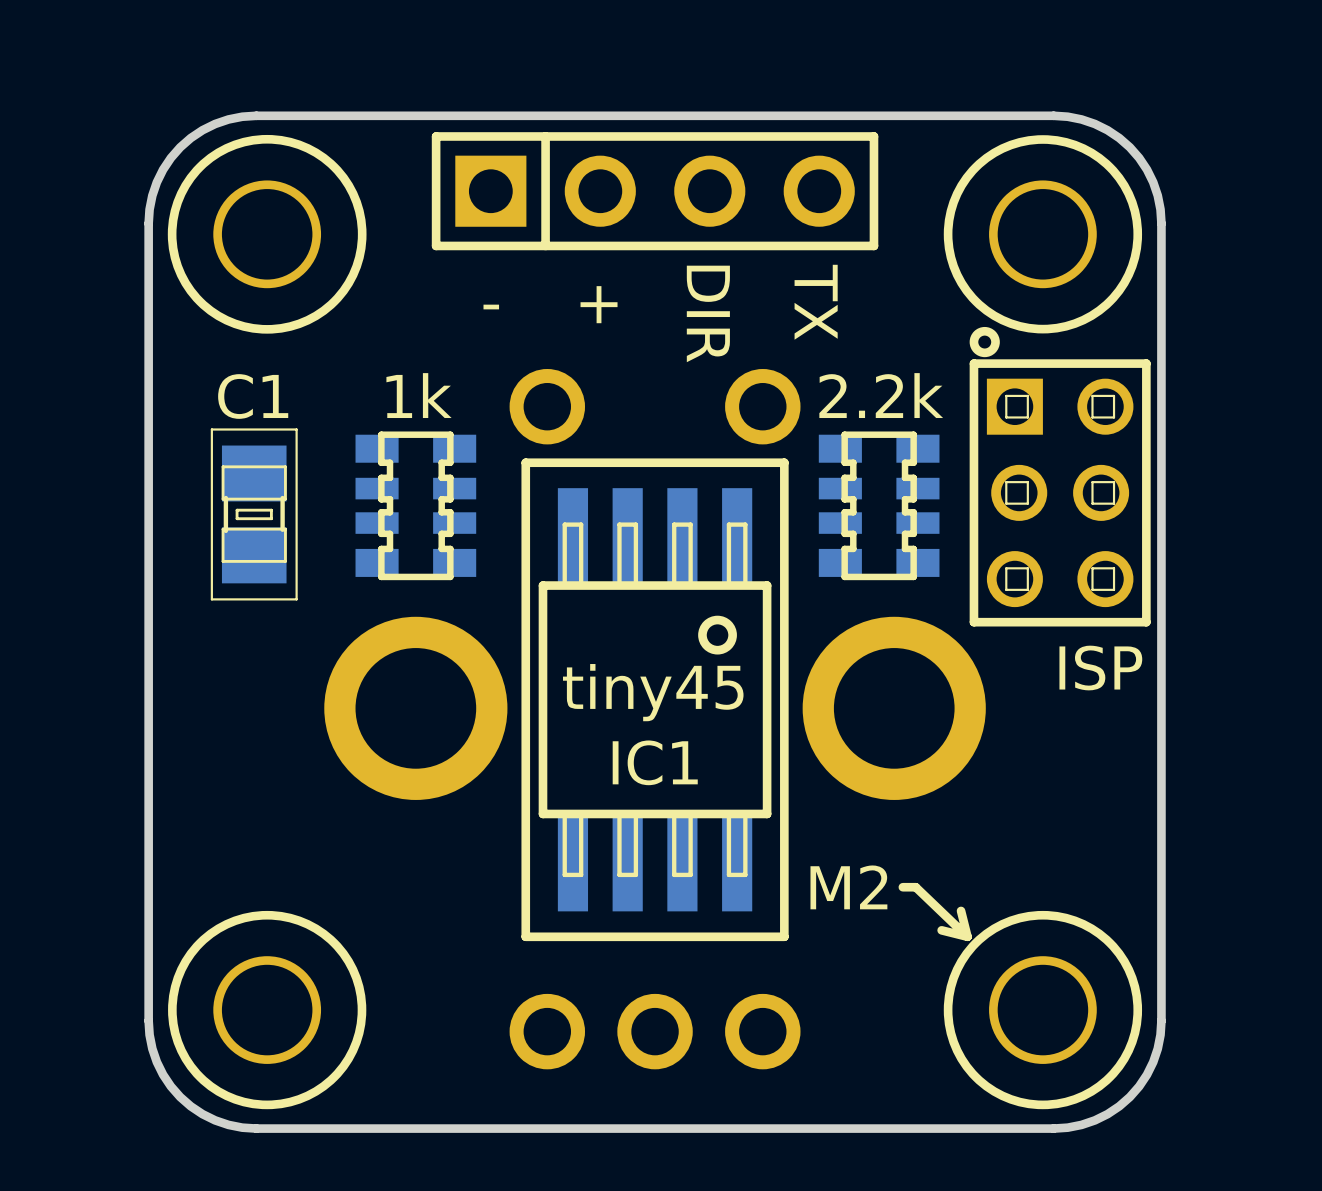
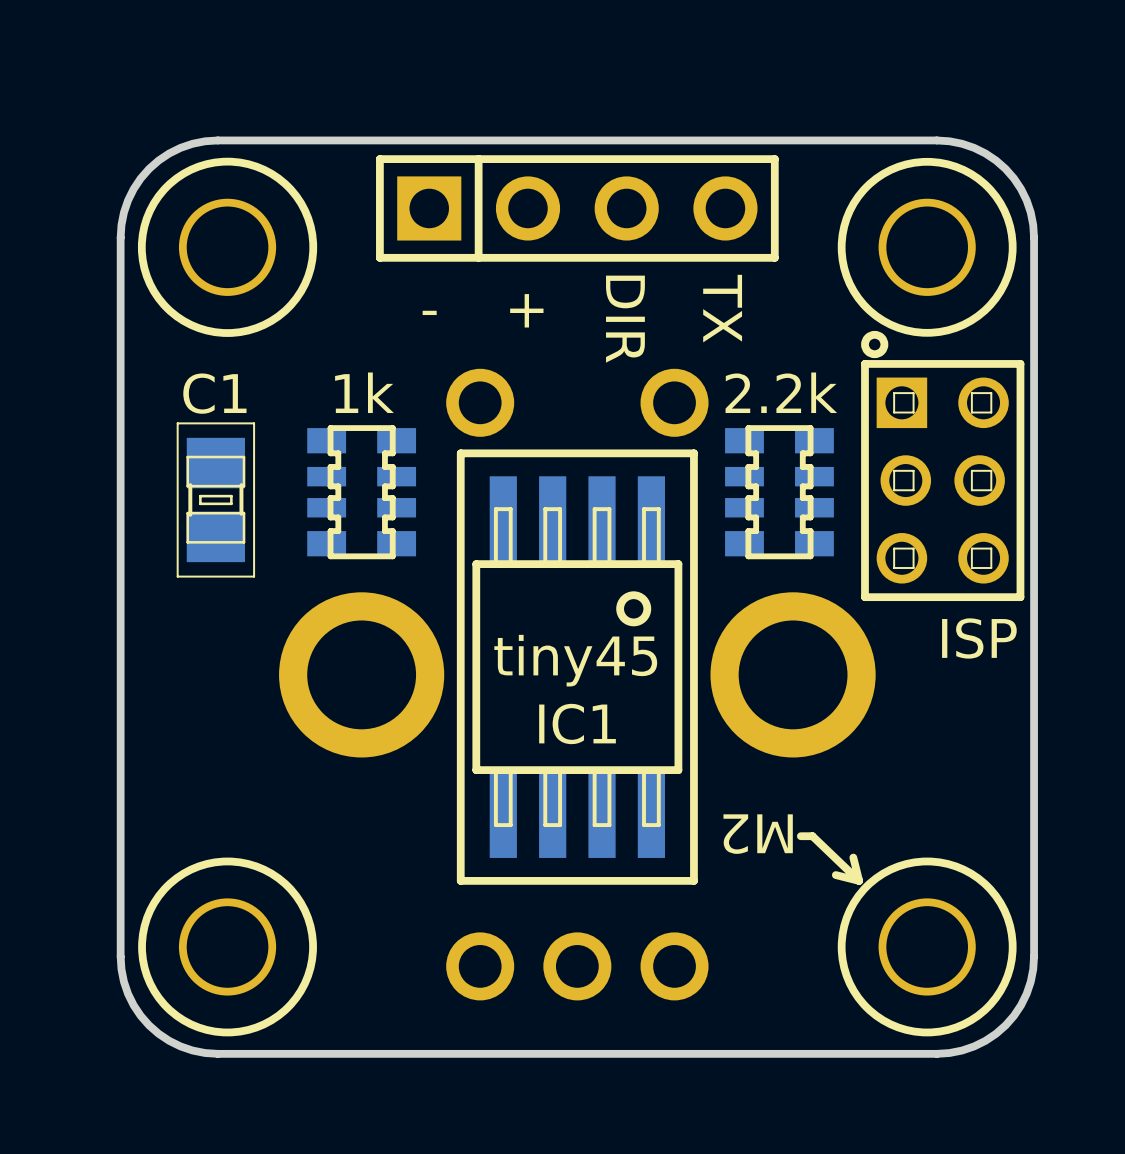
text rotation: 0° (848, 887) -> 180° (758, 834)

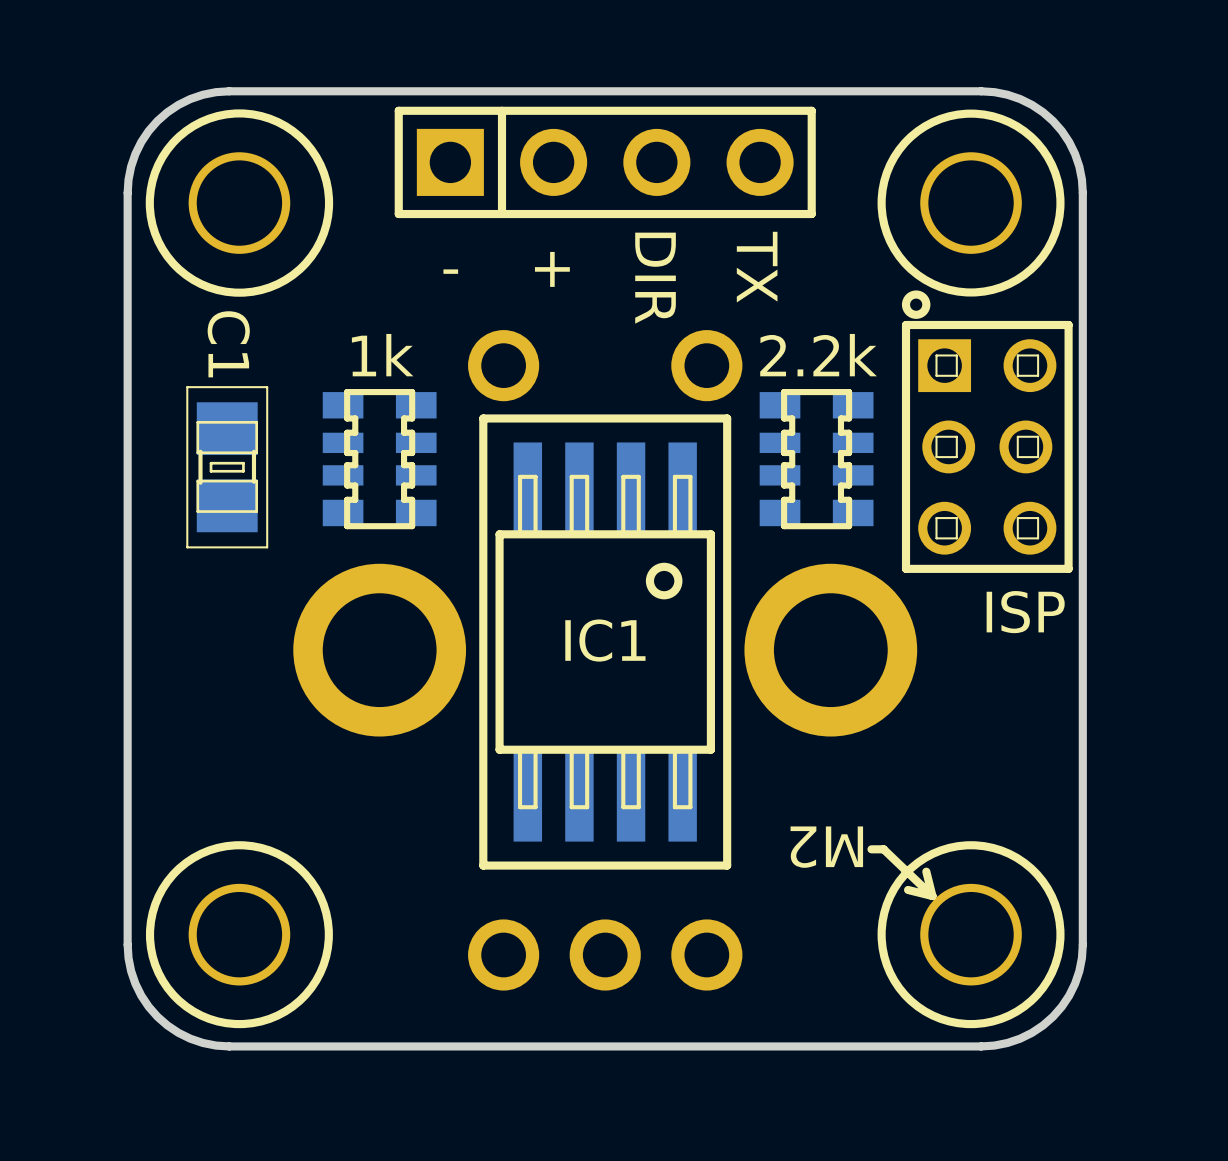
C1 name rotation: 0° (214, 393) -> 90° clockwise (228, 344)
text: tiny45 (575, 660) -> none
IC1 name position: IC1 (577, 723) -> IC1 (605, 640)
text position: M2 (758, 834) -> M2 (826, 847)
line: (800, 836) (812, 836) (859, 880) -> (871, 849) (883, 849) (932, 896)
line: (853, 857) (859, 880) -> (926, 871) (932, 896)
line: (835, 875) (859, 880) -> (908, 889) (932, 896)

